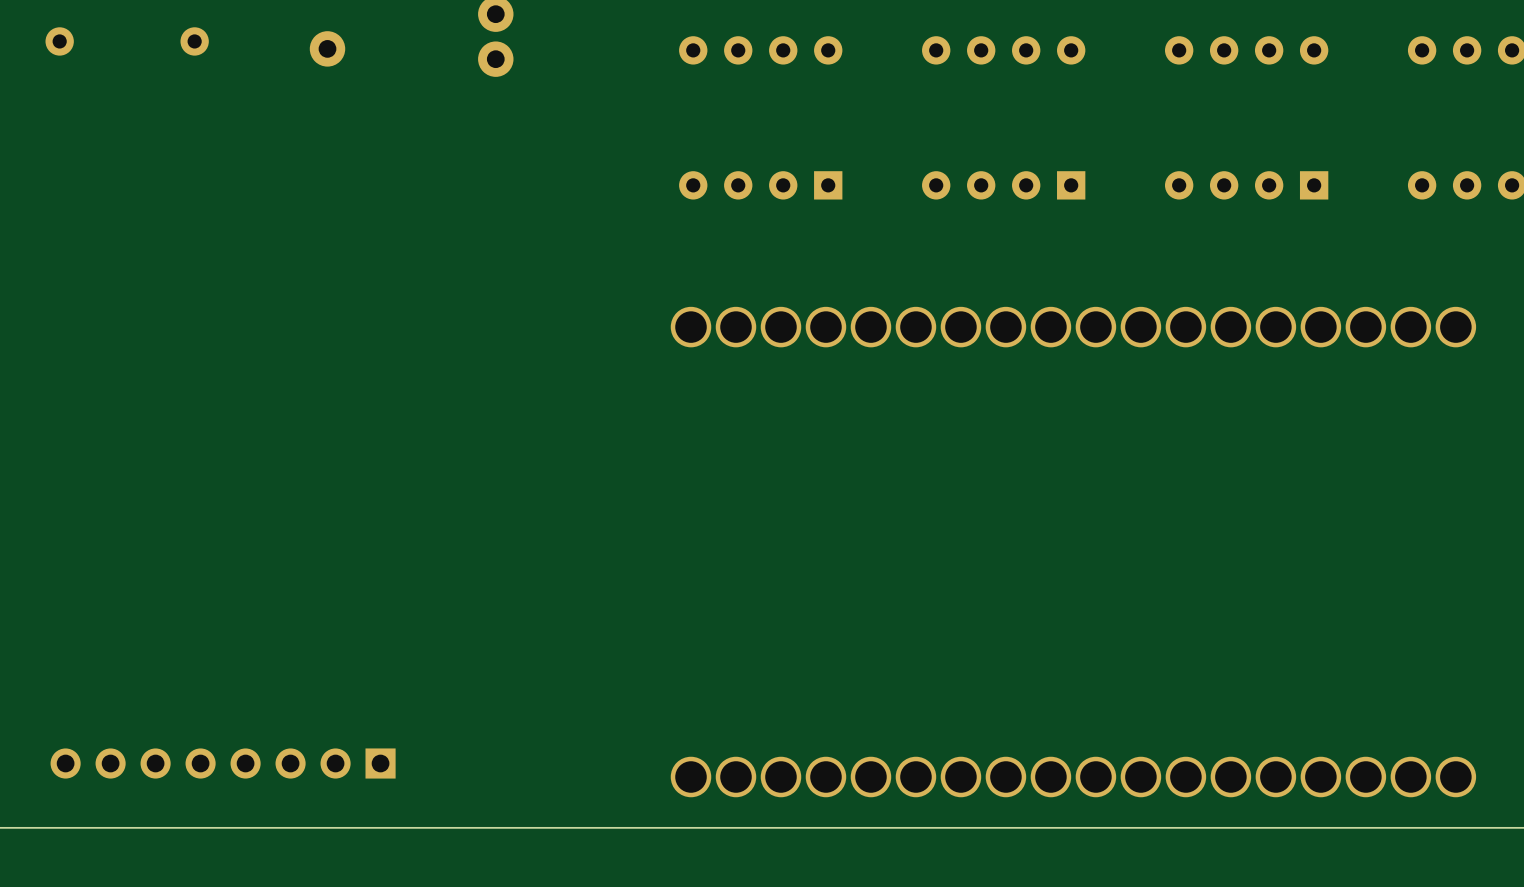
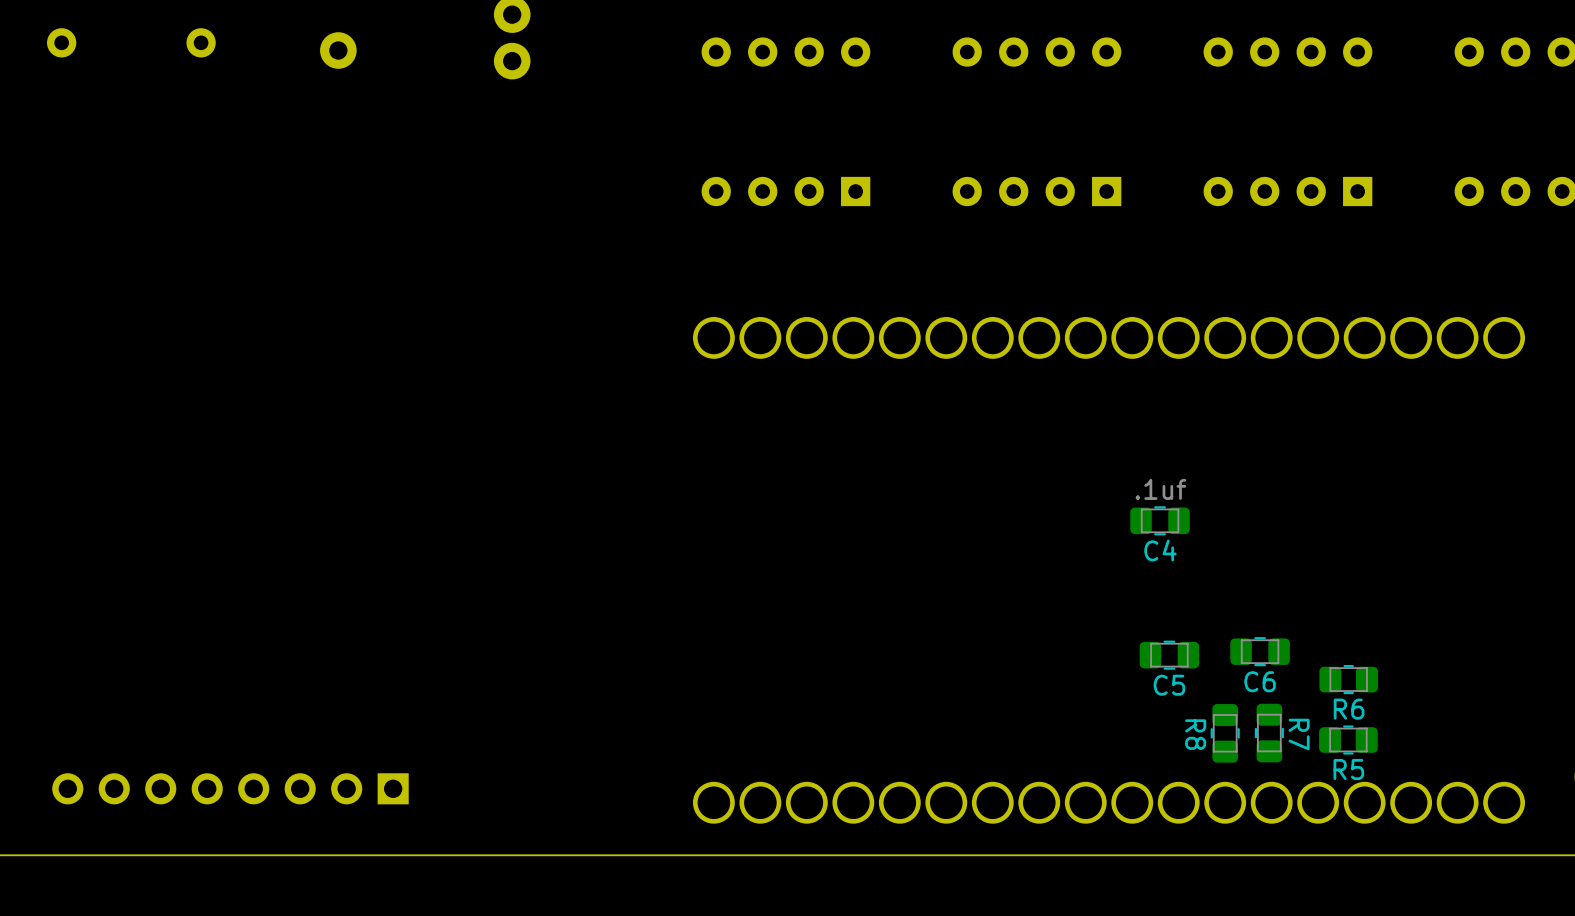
C4: none -> .1uf (1160, 520)
C6: none -> (1260, 651)
C5: none -> (1169, 655)
R6: none -> (1348, 679)
R7: none -> (1225, 733)
R8: none -> (1269, 733)
R5: none -> (1348, 739)

